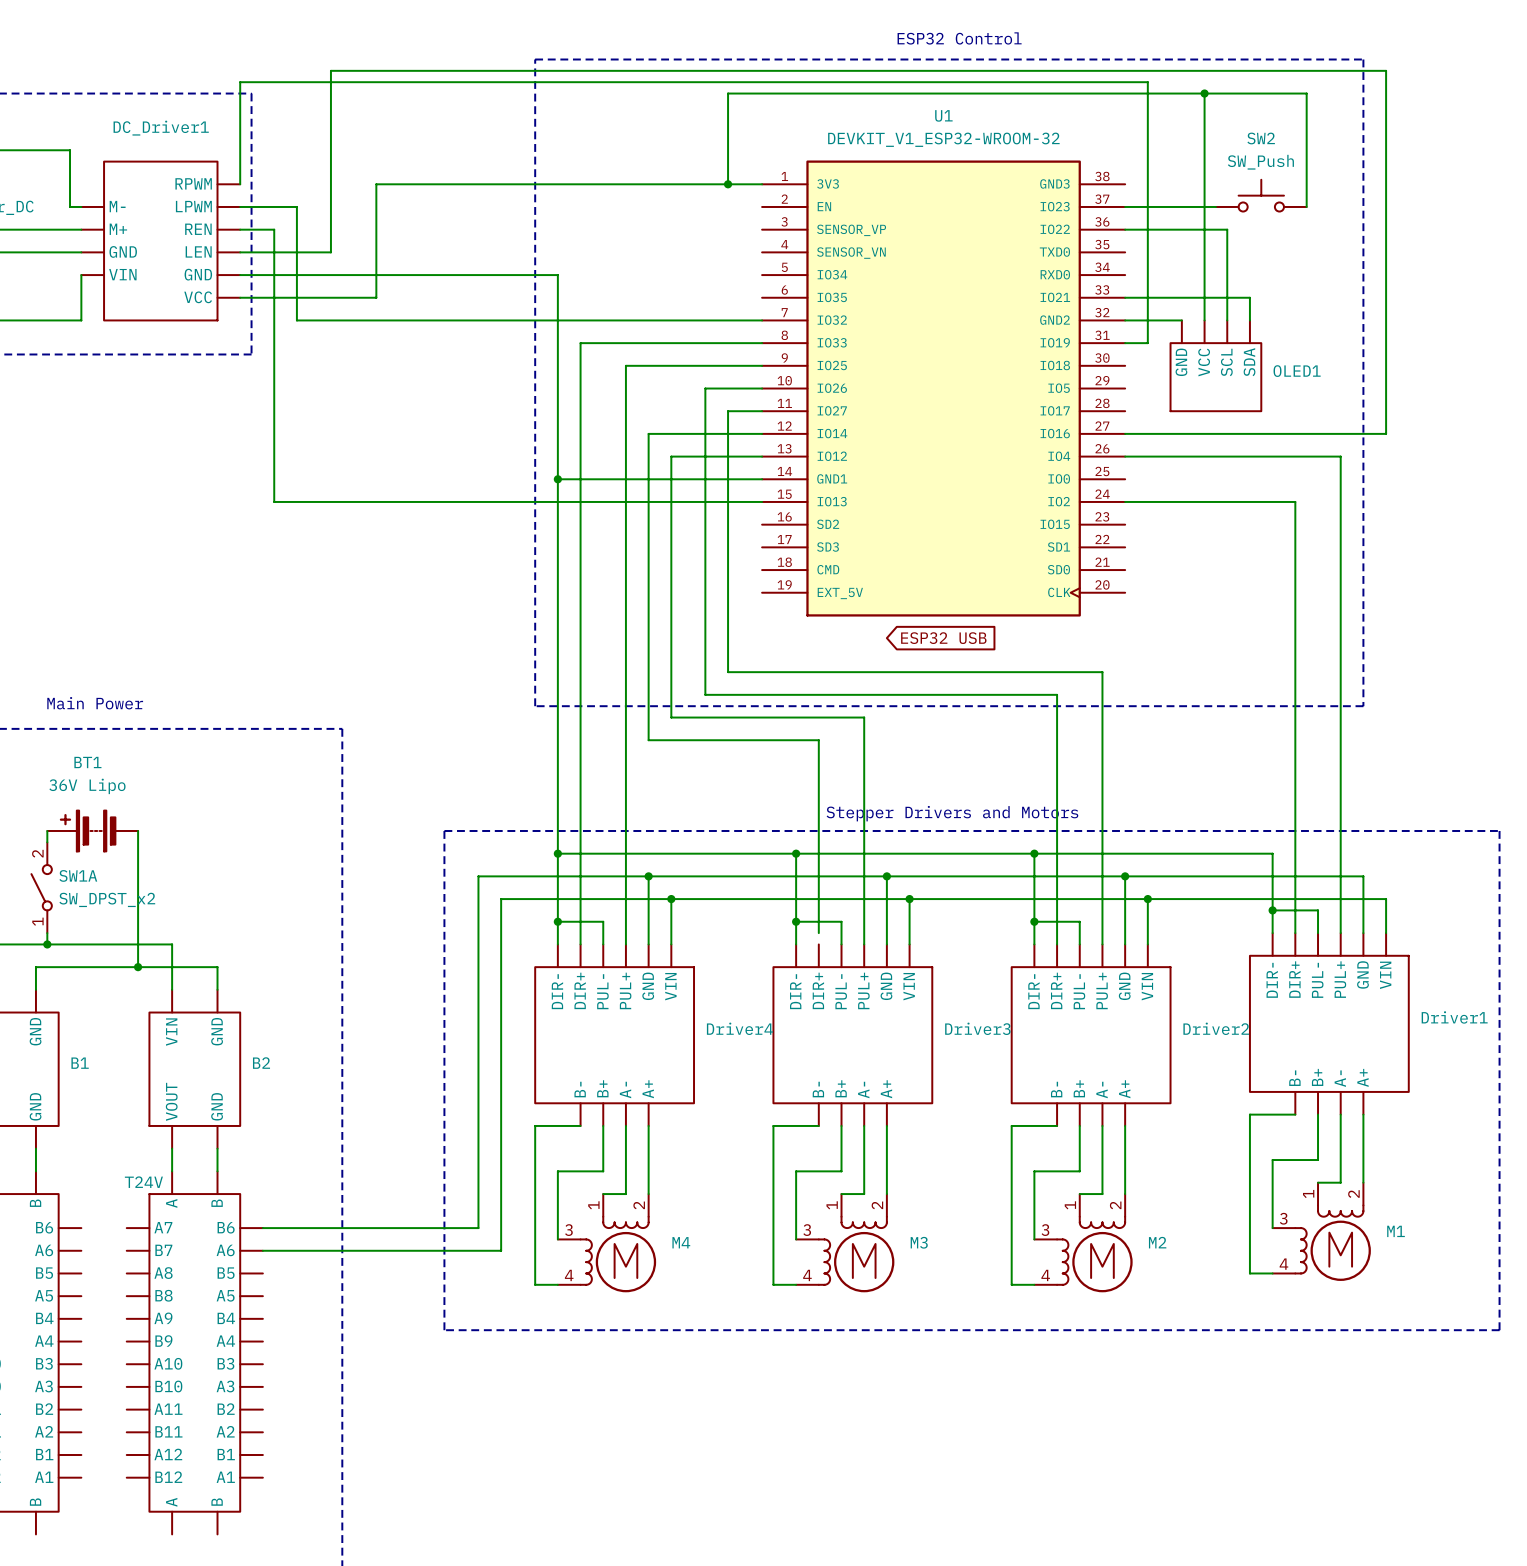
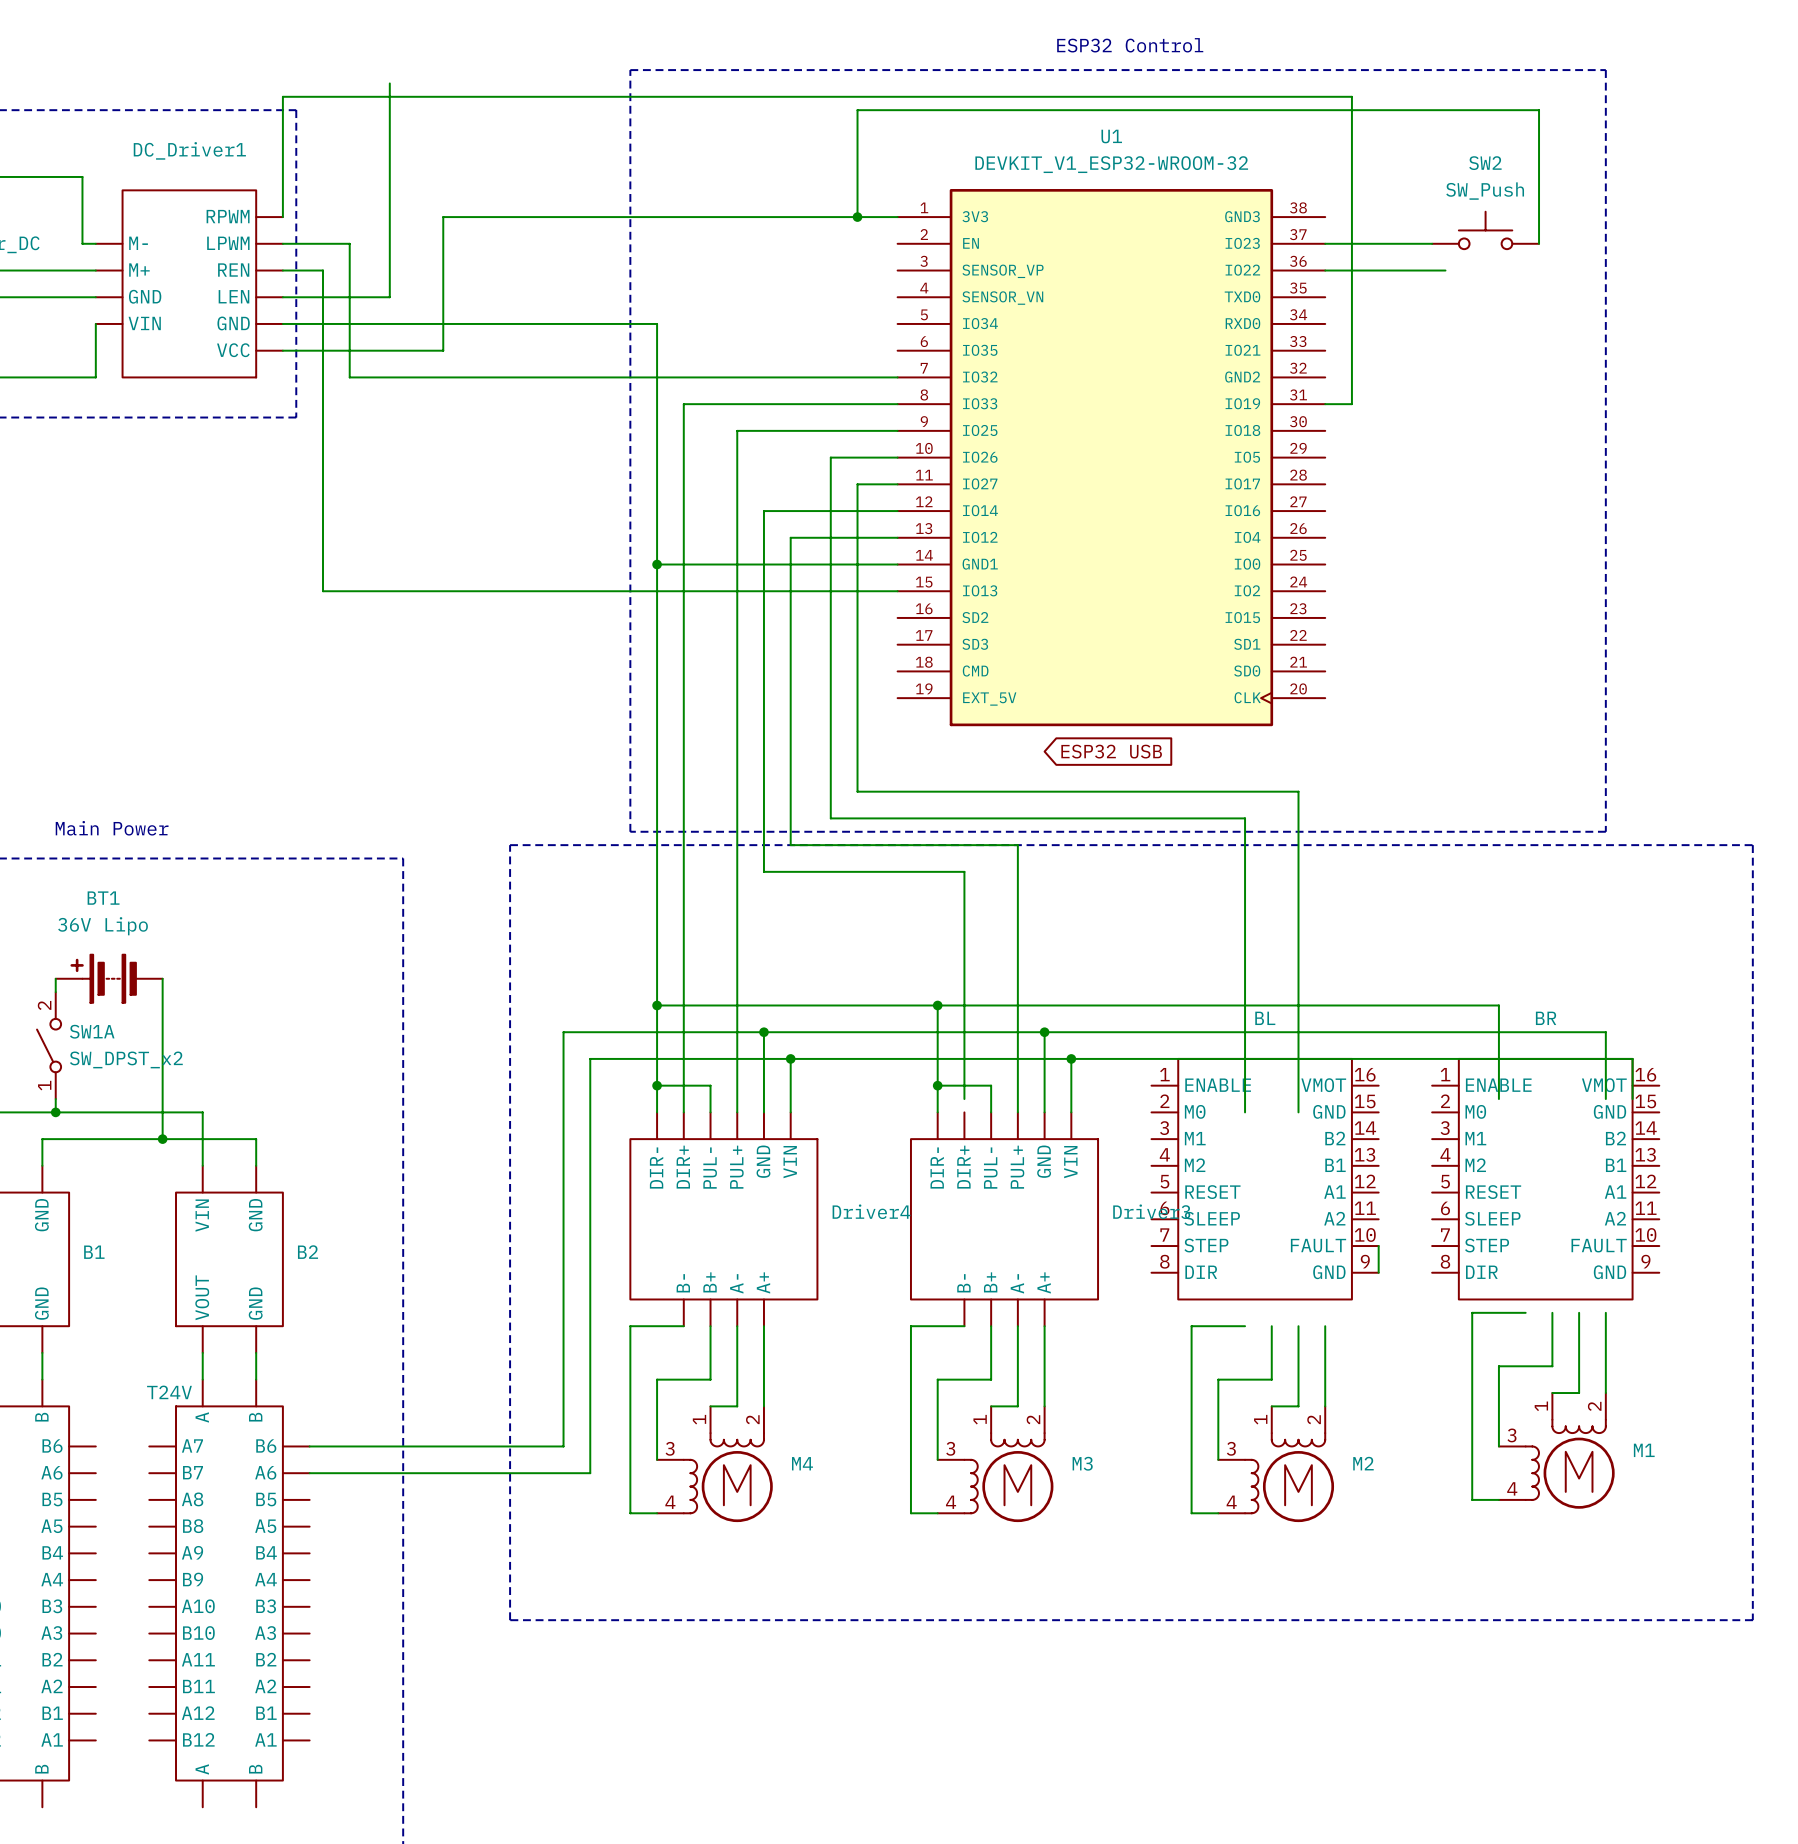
wire: (330, 70) (1386, 70) (1386, 433) (1125, 433) -> none
wire: (1204, 93) (1204, 320) -> none
junction: (1204, 93) -> none
wire: (1227, 229) (1227, 320) -> none
wire: (1125, 297) (1249, 297) (1249, 320) -> none
wire: (1125, 320) (1181, 320) -> none
OLED1: (1215, 365) -> none
wire: (1125, 456) (1340, 456) (1340, 933) -> none
wire: (1125, 501) (1295, 501) (1295, 933) -> none
text: Stepper Drivers and Motors (952, 813) -> none
line: (444, 830) (1499, 830) (1499, 1330) (444, 1330) (444, 830) -> (510, 845) (510, 1620) (1752, 1620) (1752, 845) (510, 845)
wire: (1034, 853) (1034, 944) -> none
junction: (1034, 853) -> none
wire: (1125, 876) (1125, 944) -> none
junction: (1125, 876) -> none
junction: (1147, 899) -> none
wire: (1272, 910) (1318, 910) (1318, 933) -> none
junction: (1272, 910) -> none
wire: (1034, 921) (1079, 921) (1079, 944) -> none
junction: (1034, 921) -> none
BL: none -> (1265, 1179)
BR: none -> (1545, 1179)
Driver1: (1329, 1023) -> none
Driver2: (1091, 1035) -> none

